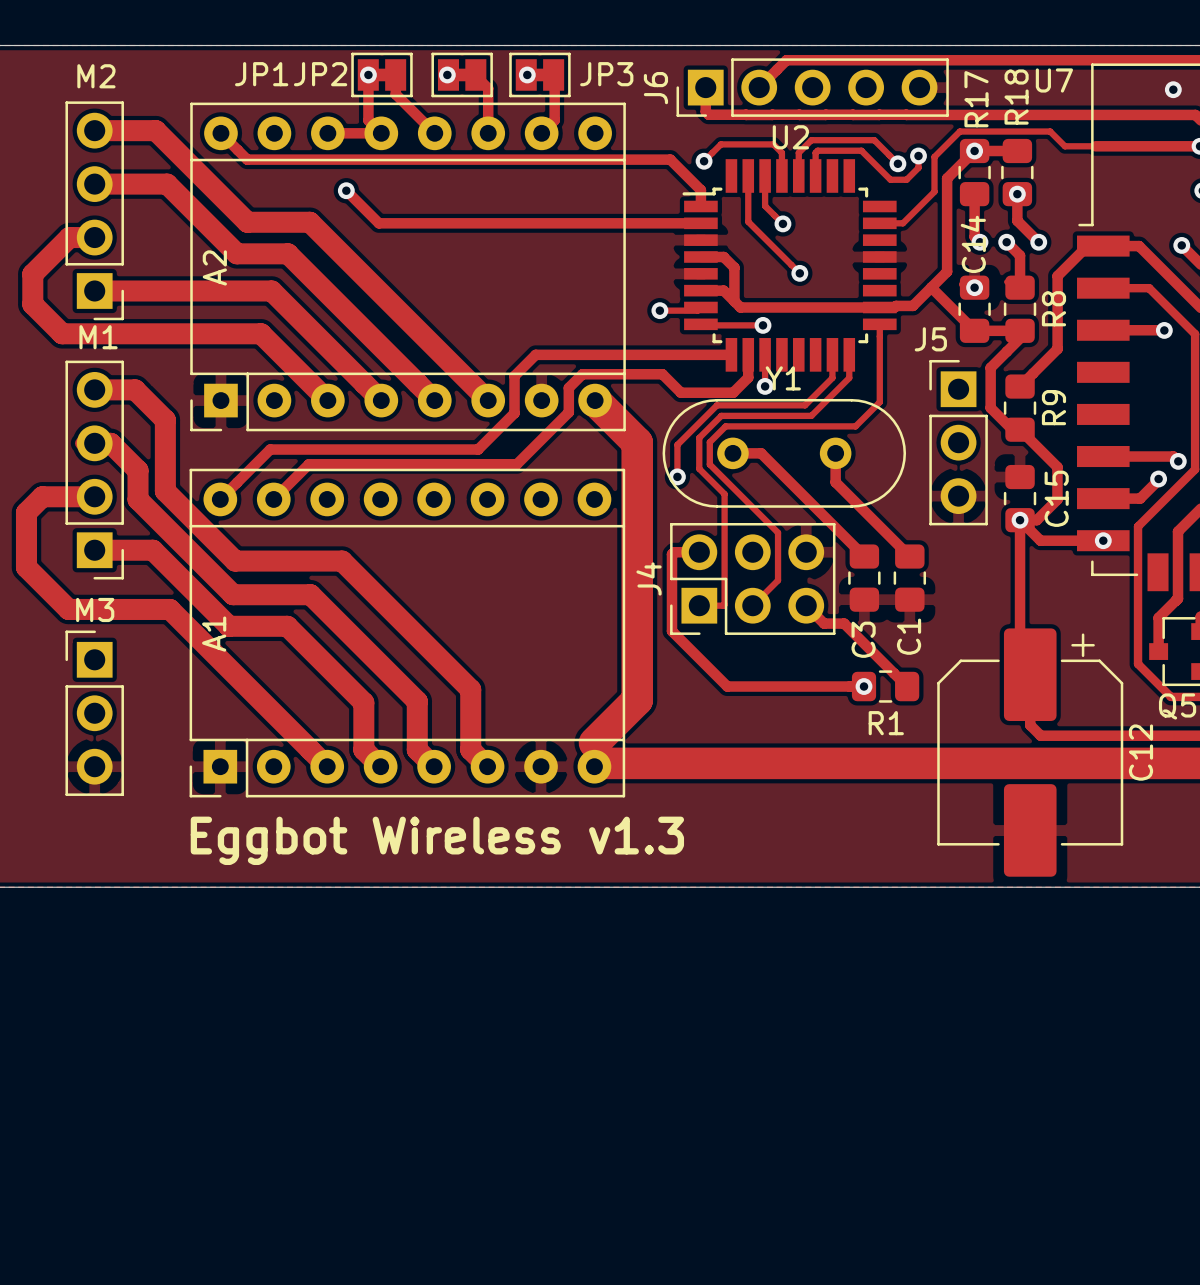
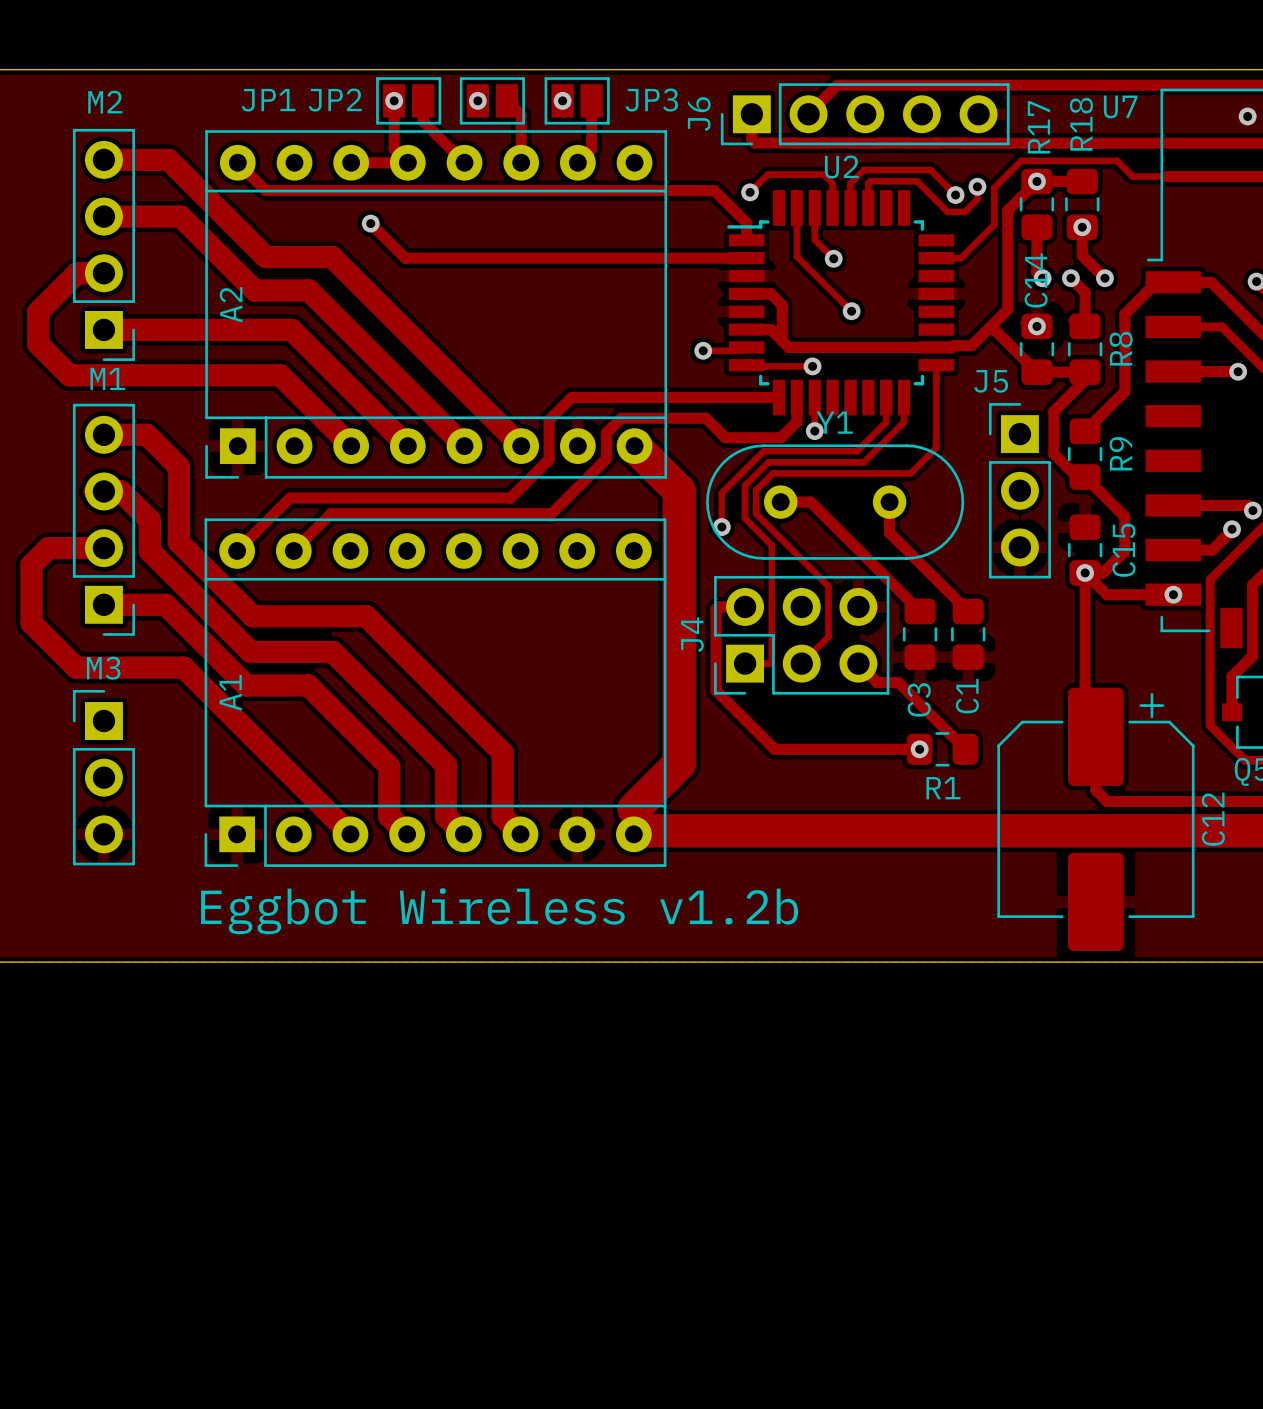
JP1 footprint: [351, 52, 413, 98] -> [376, 77, 442, 125]
JP2 footprint: [431, 52, 493, 98] -> [459, 77, 525, 125]
JP3 footprint: [509, 52, 571, 98] -> [544, 77, 610, 125]
text: Eggbot Wireless v1.3 (437, 840) -> Eggbot Wireless v1.2b (499, 911)

